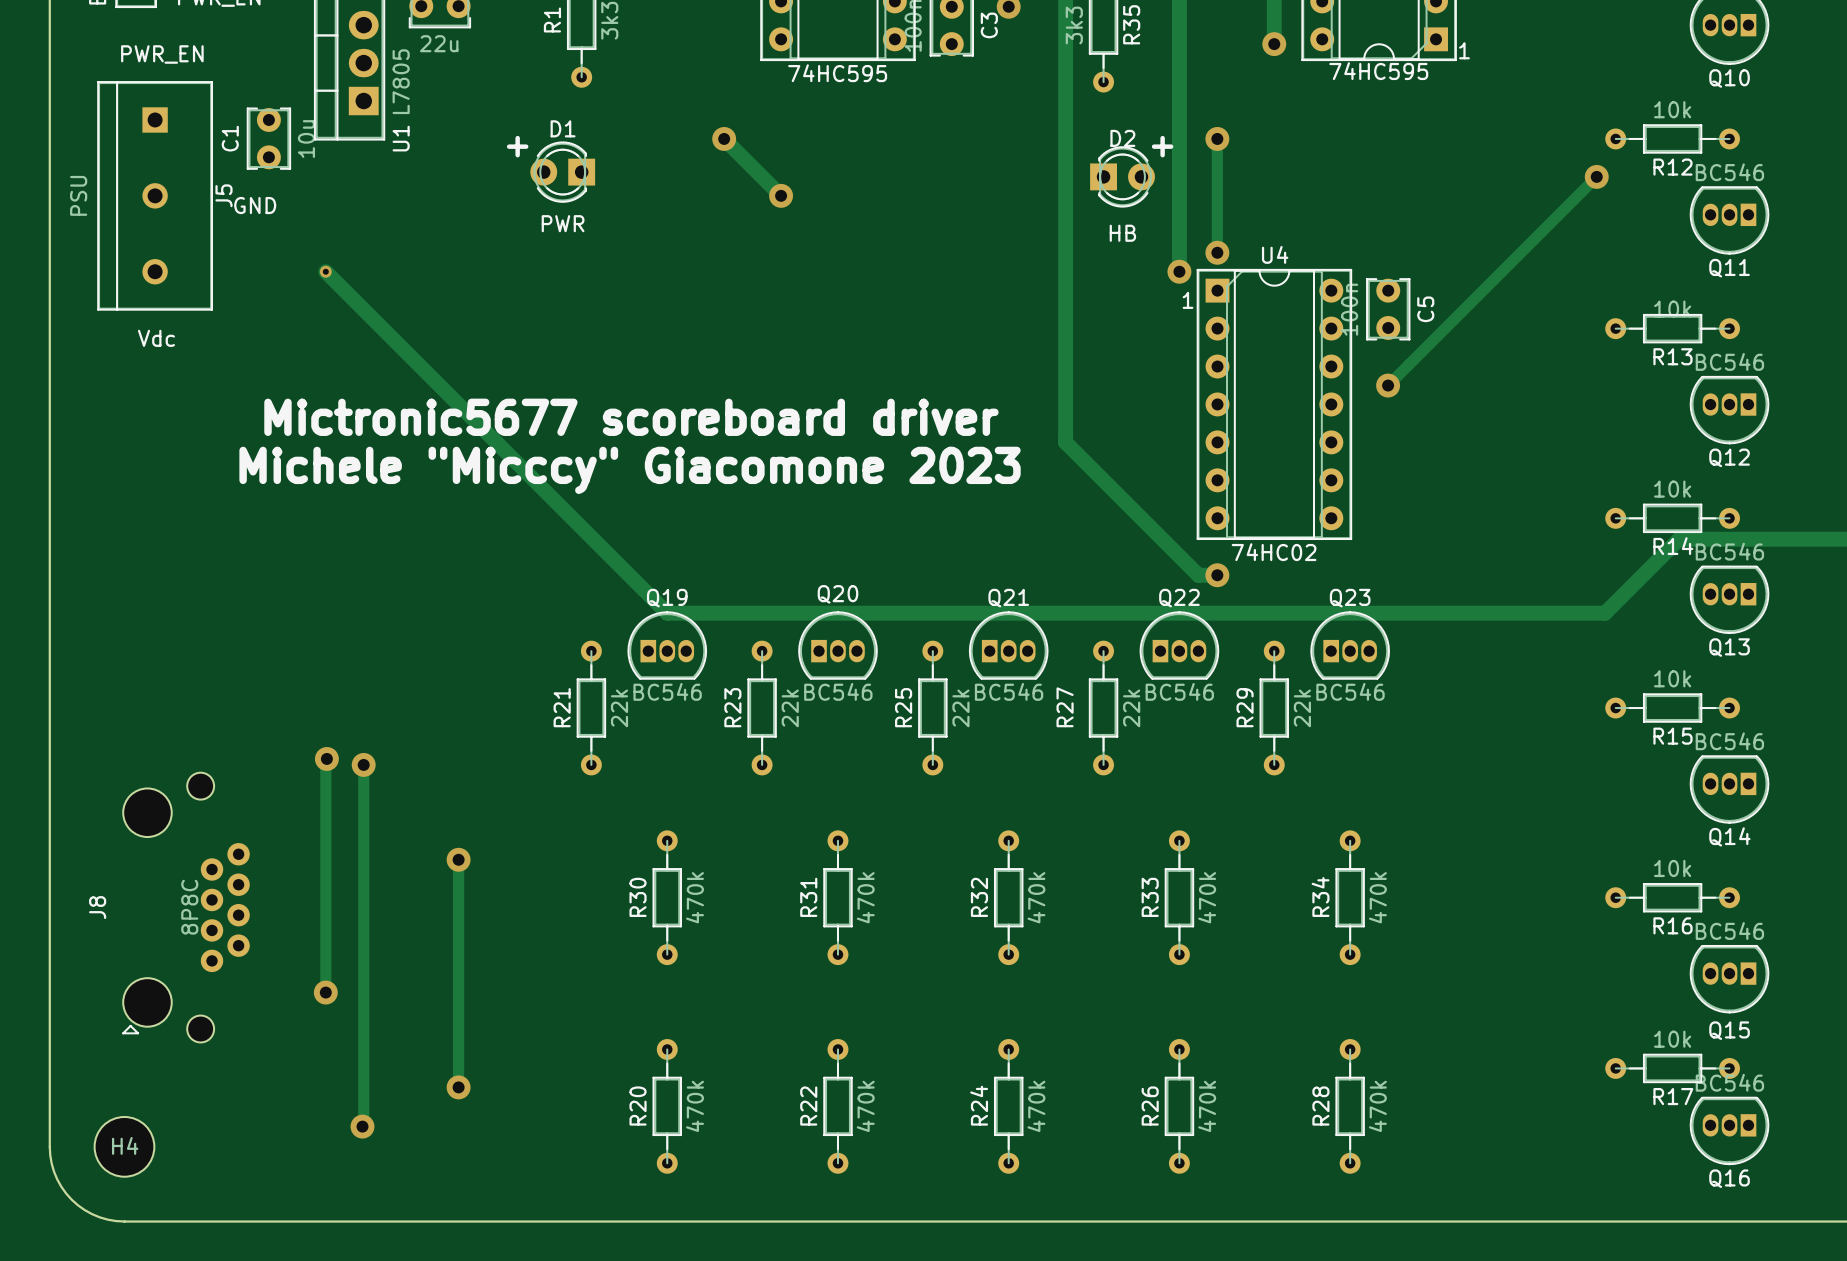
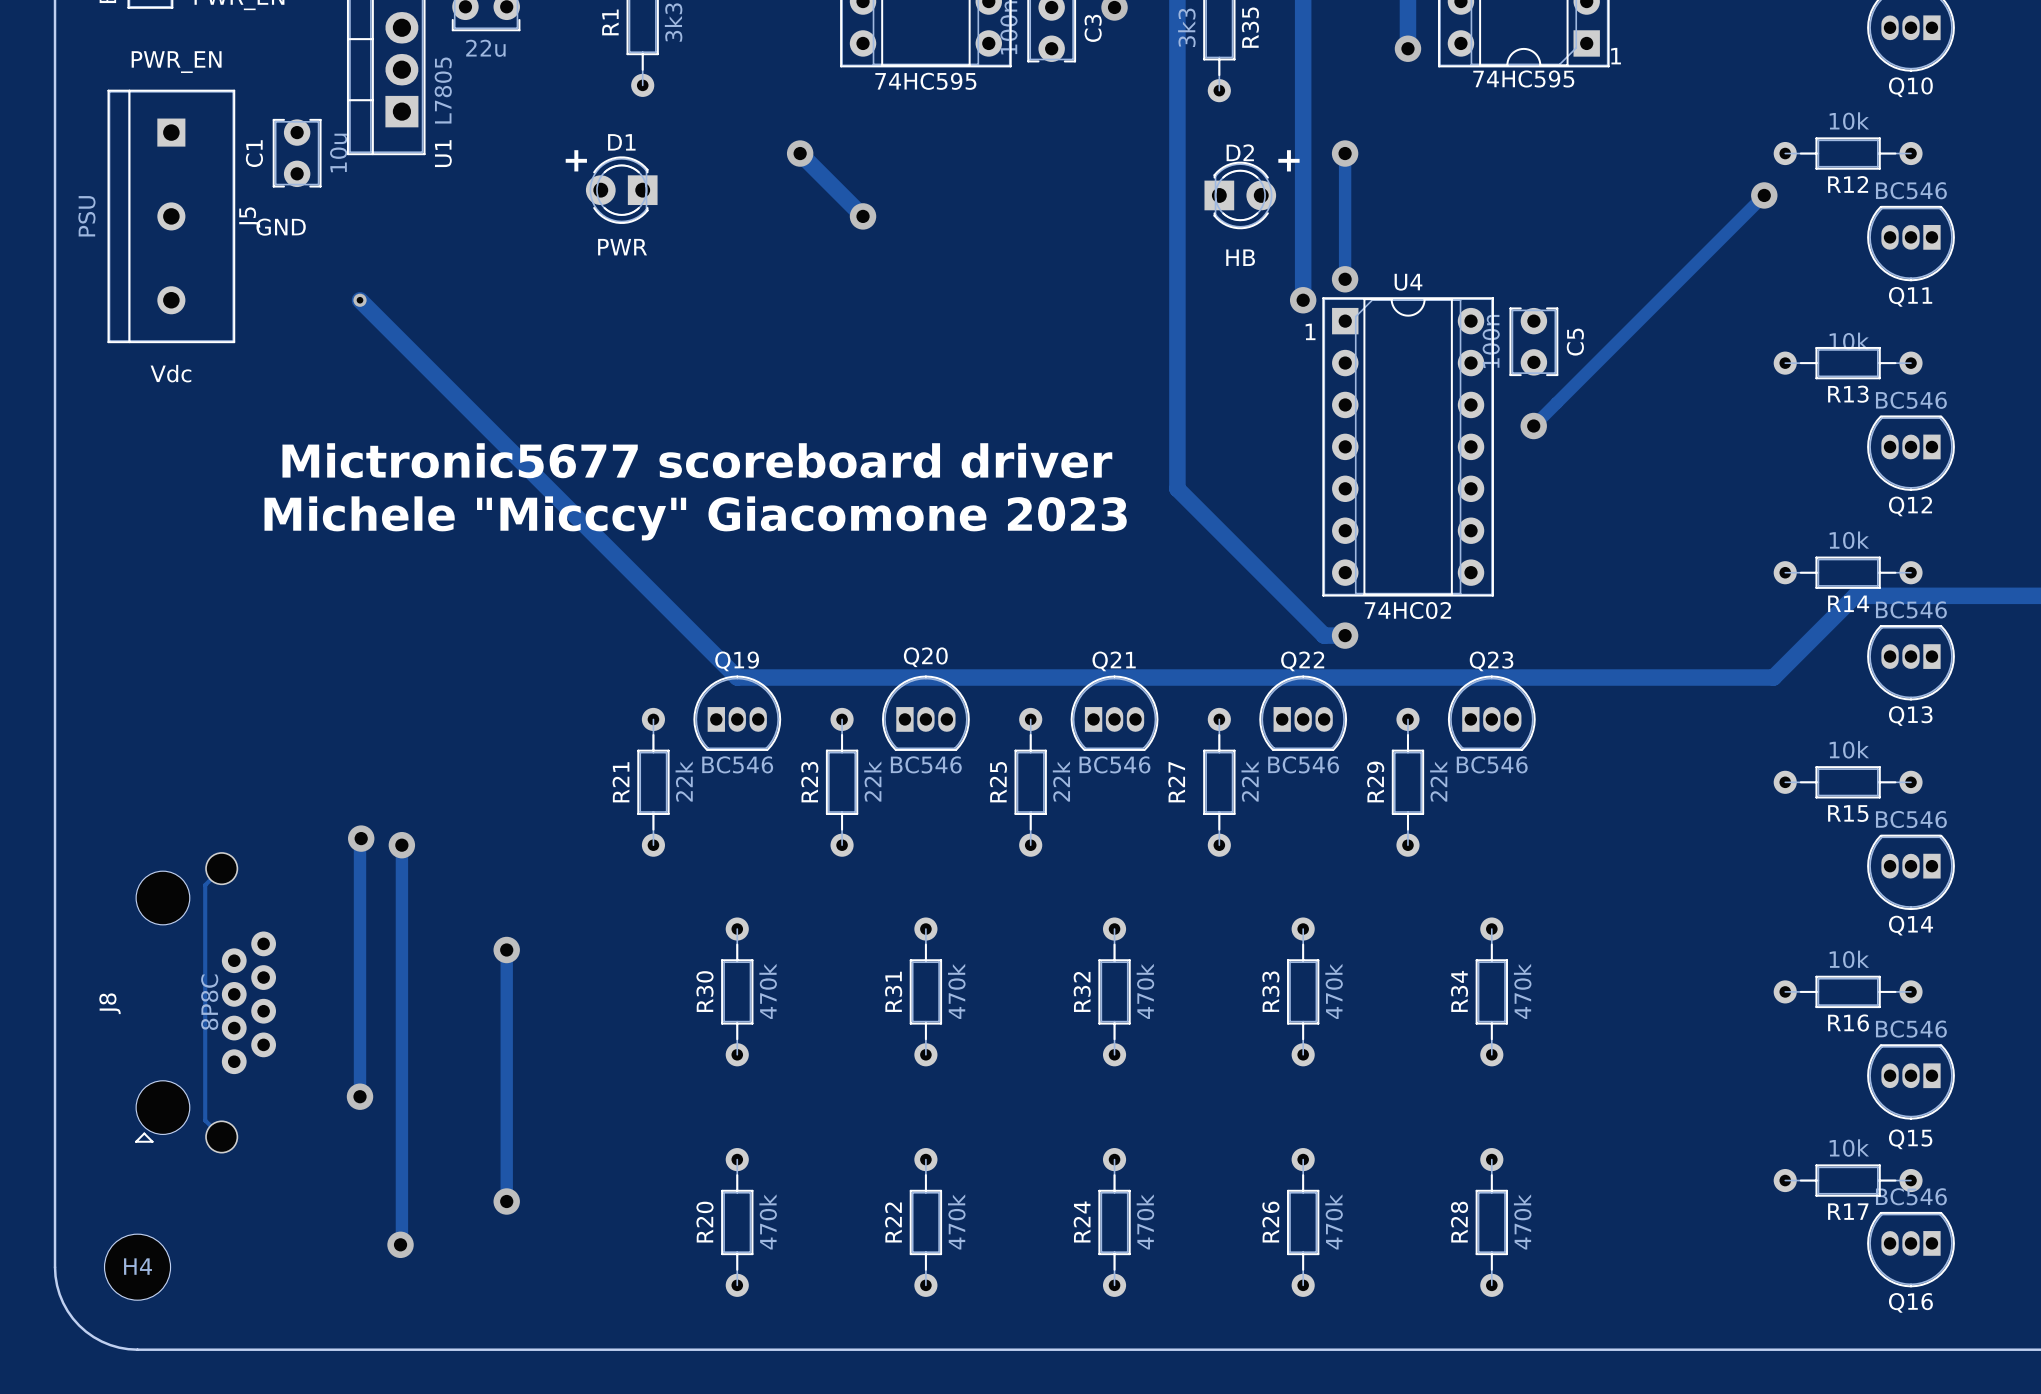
J8 footprint: [122, 772, 250, 1043] -> [135, 852, 277, 1154]
track: none -> (221, 868) (205, 885) (205, 1120) (221, 1136)

